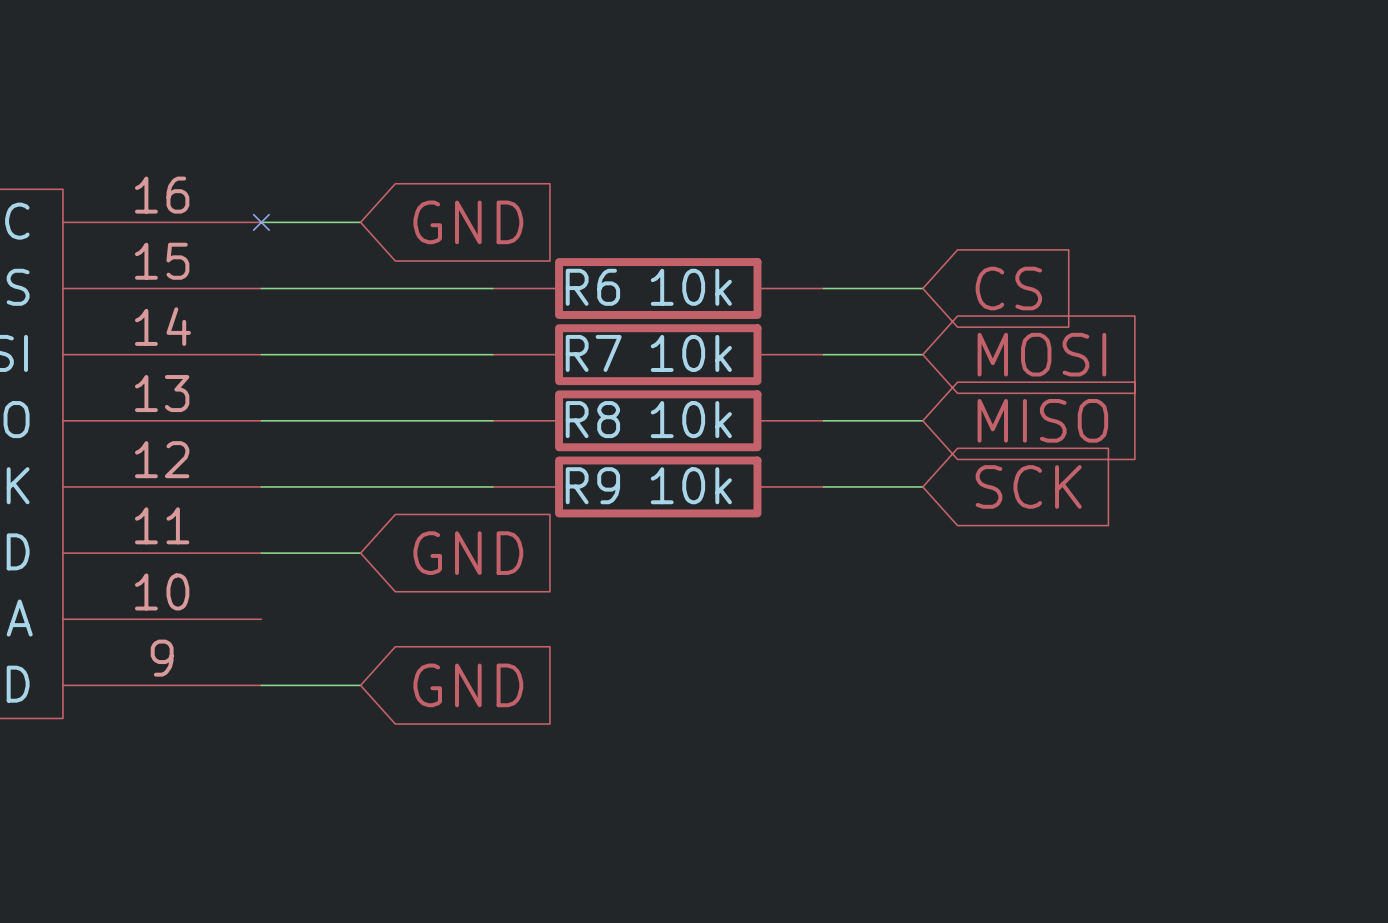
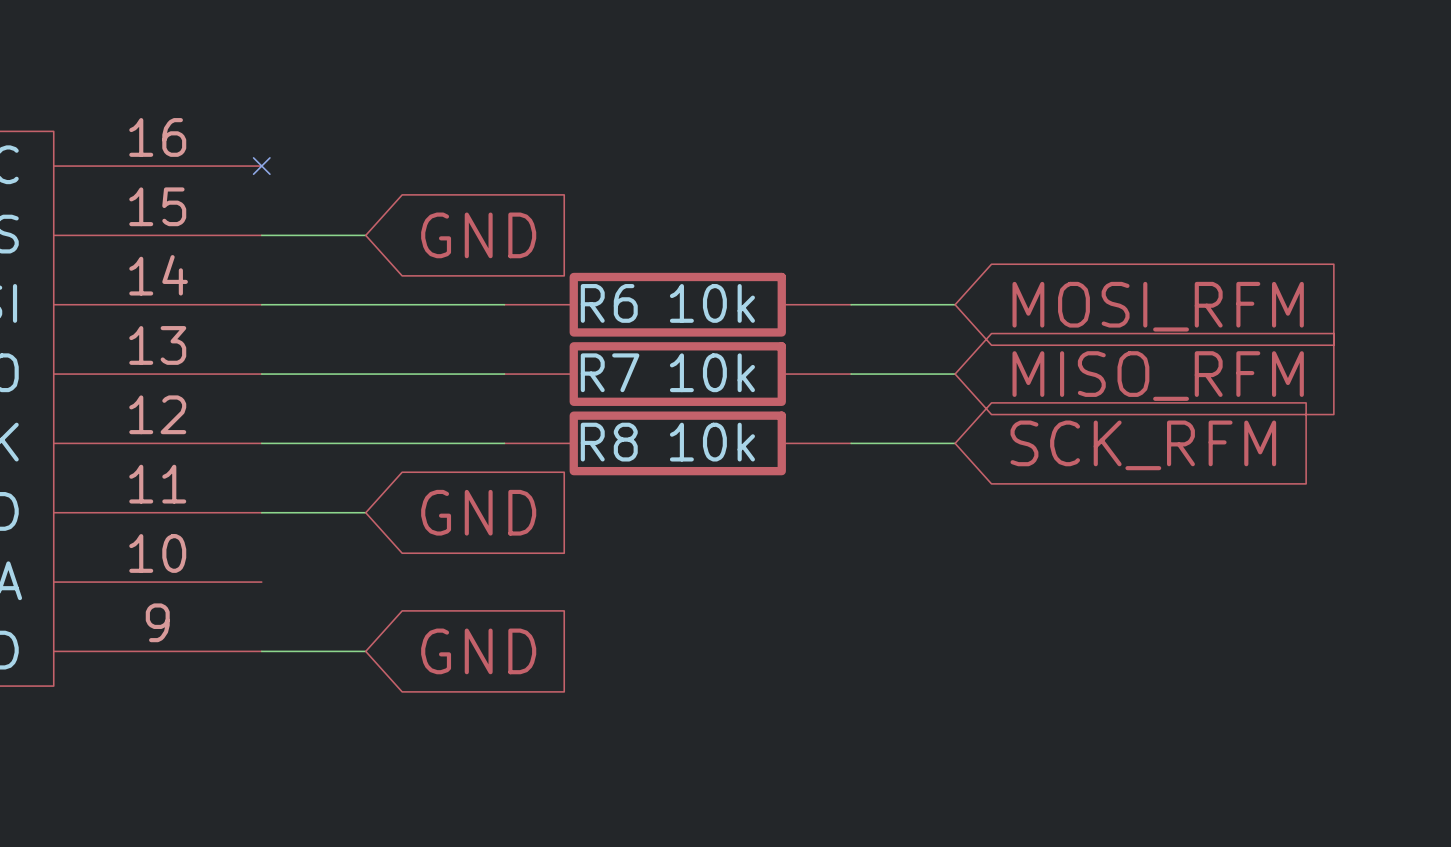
wire: (261, 222) (360, 222) -> none
global label position: GND (468, 222) -> GND (478, 235)
wire: (360, 288) (492, 288) -> none
R6: 10k (658, 288) -> none
wire: (823, 288) (922, 288) -> none
global label: CS (1008, 288) -> none
R7 name: R7 (593, 353) -> R6 (609, 303)
global label: MOSI (1041, 354) -> MOSI_RFM (1158, 306)
R8 name: R8 (592, 419) -> R7 (610, 372)
global label: MISO (1042, 420) -> MISO_RFM (1158, 376)
R9 name: R9 (592, 485) -> R8 (609, 442)
global label: SCK (1028, 486) -> SCK_RFM (1143, 445)

